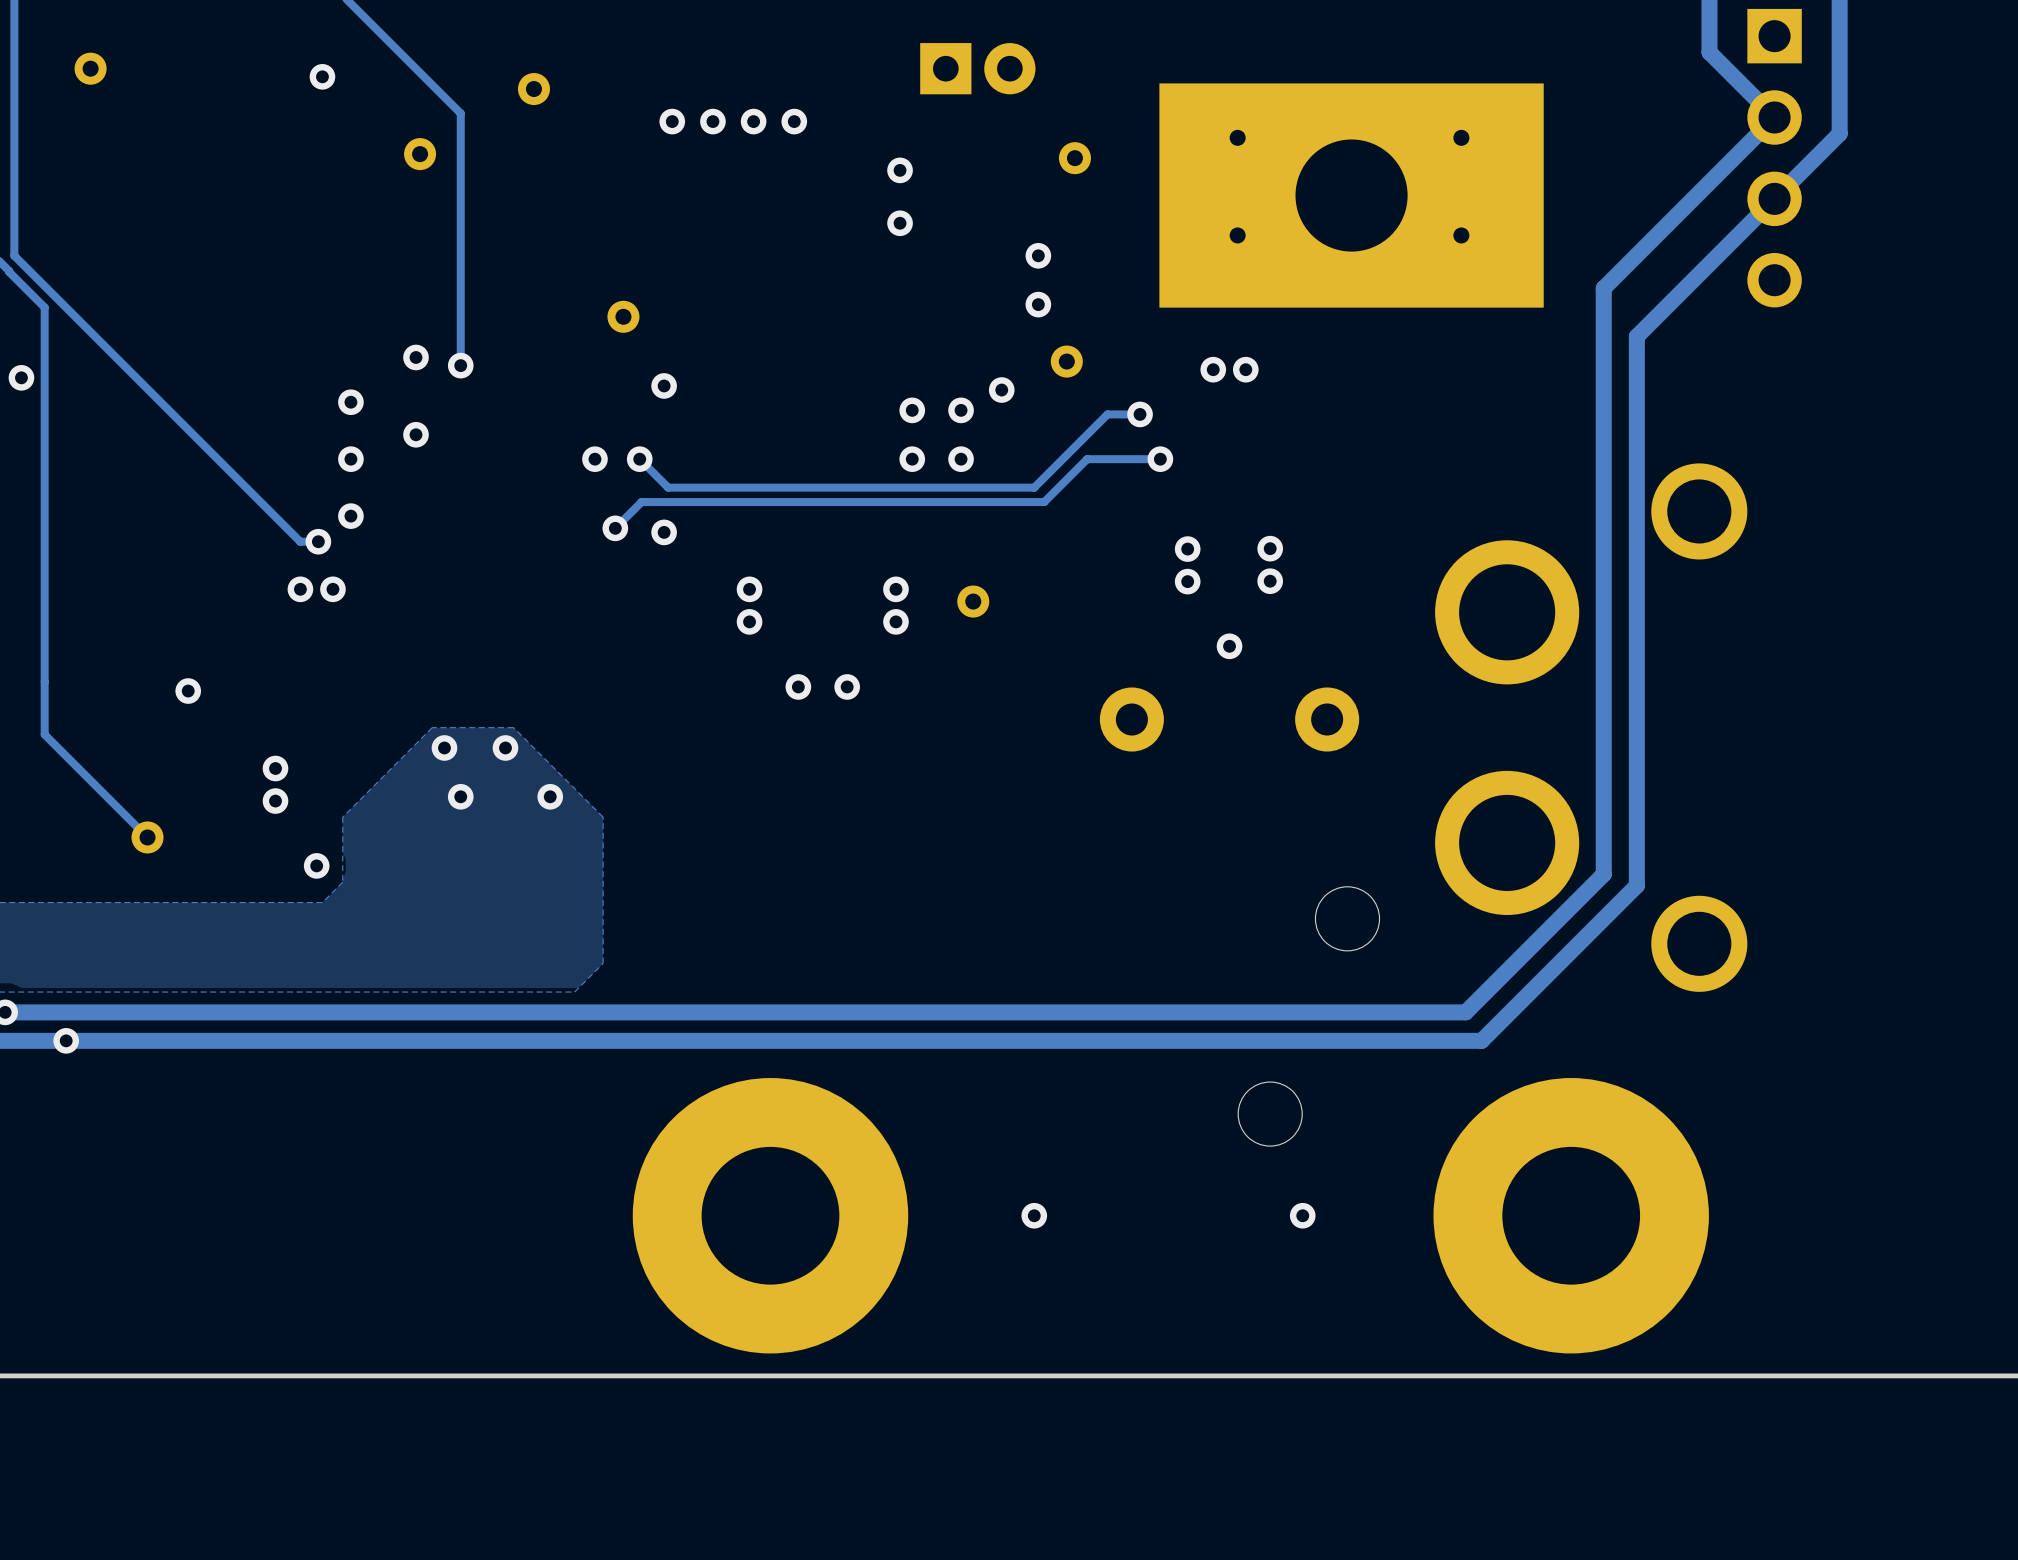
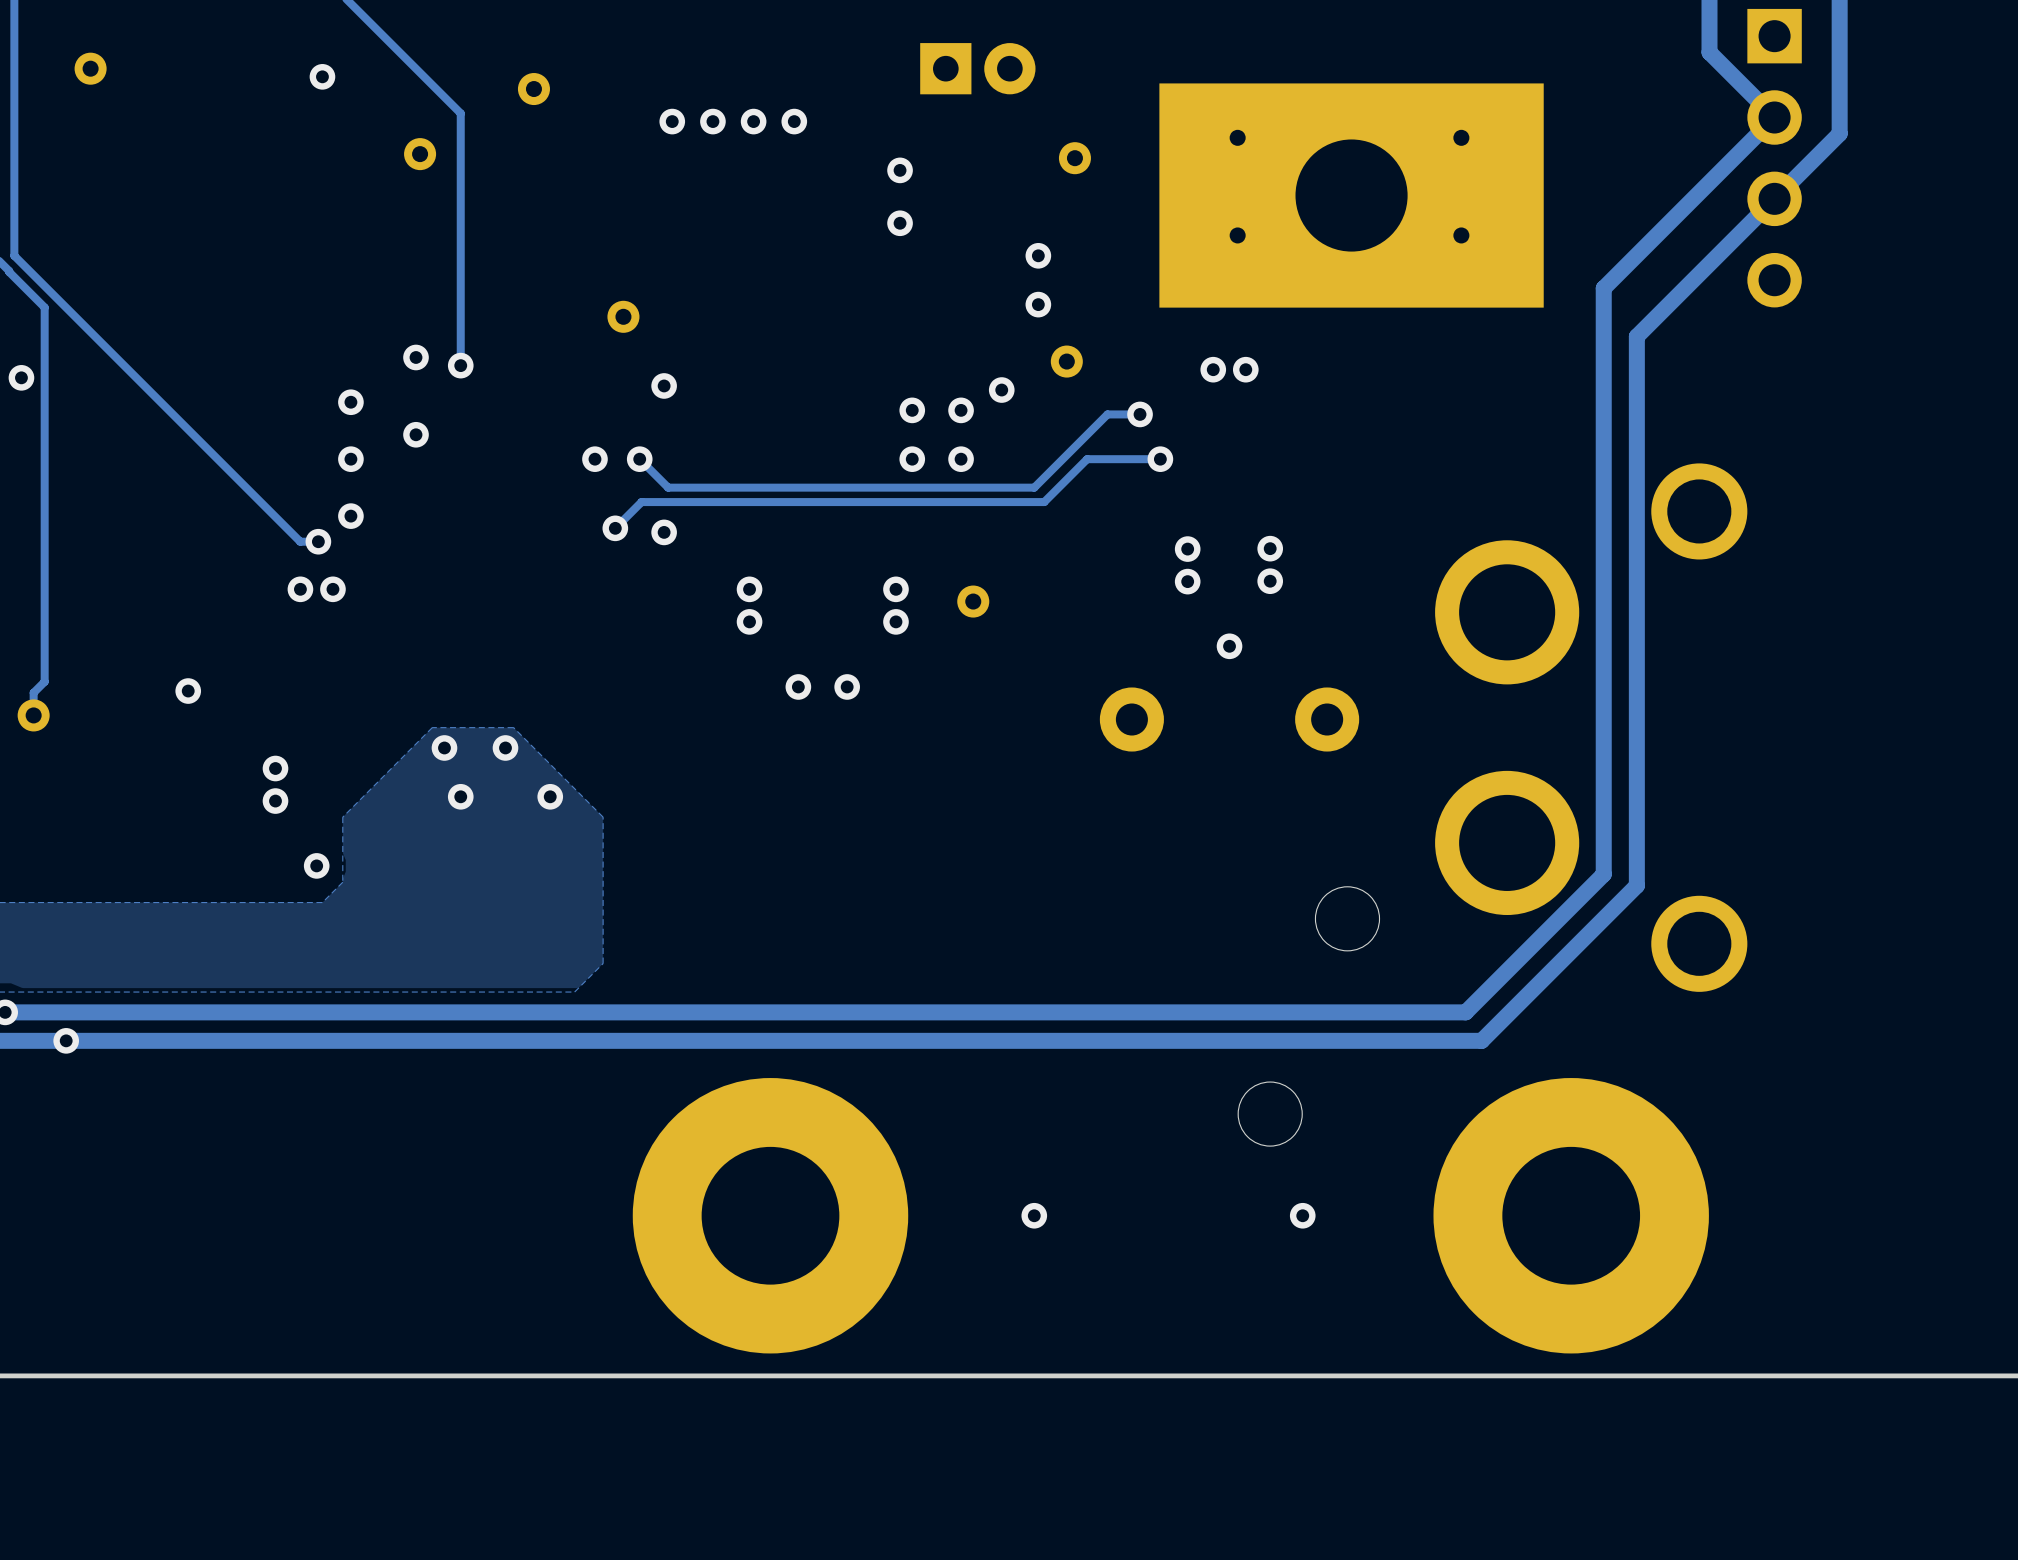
track: (44, 681) (44, 734) (147, 837) -> (44, 681) (33, 692) (33, 715)
part: none -> (33, 715)
part: (147, 837) -> none

